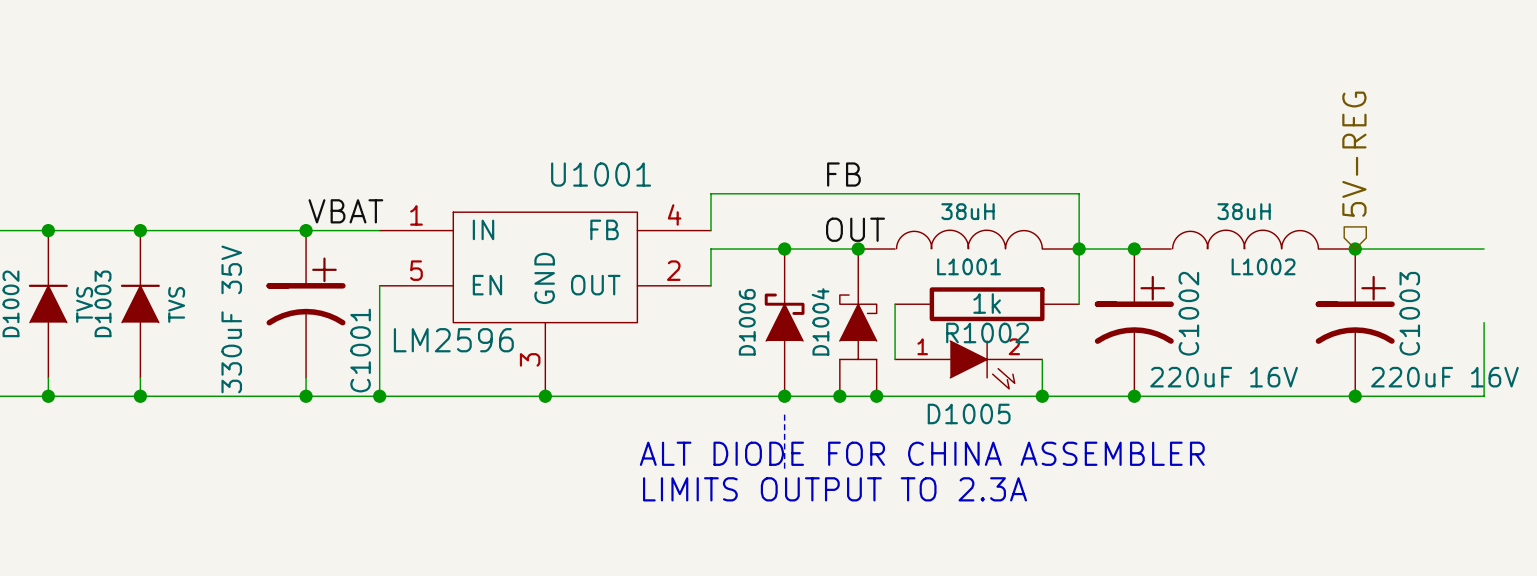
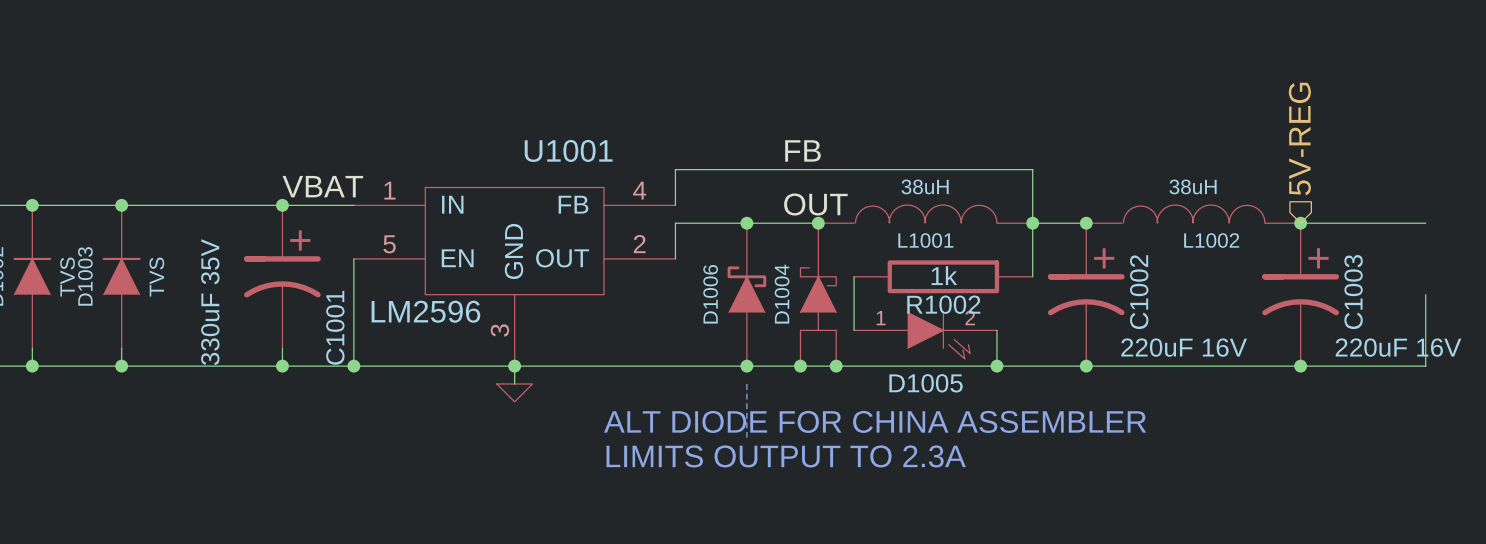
wire: none -> (514, 366) (514, 383)
power symbol: none -> (514, 392)

